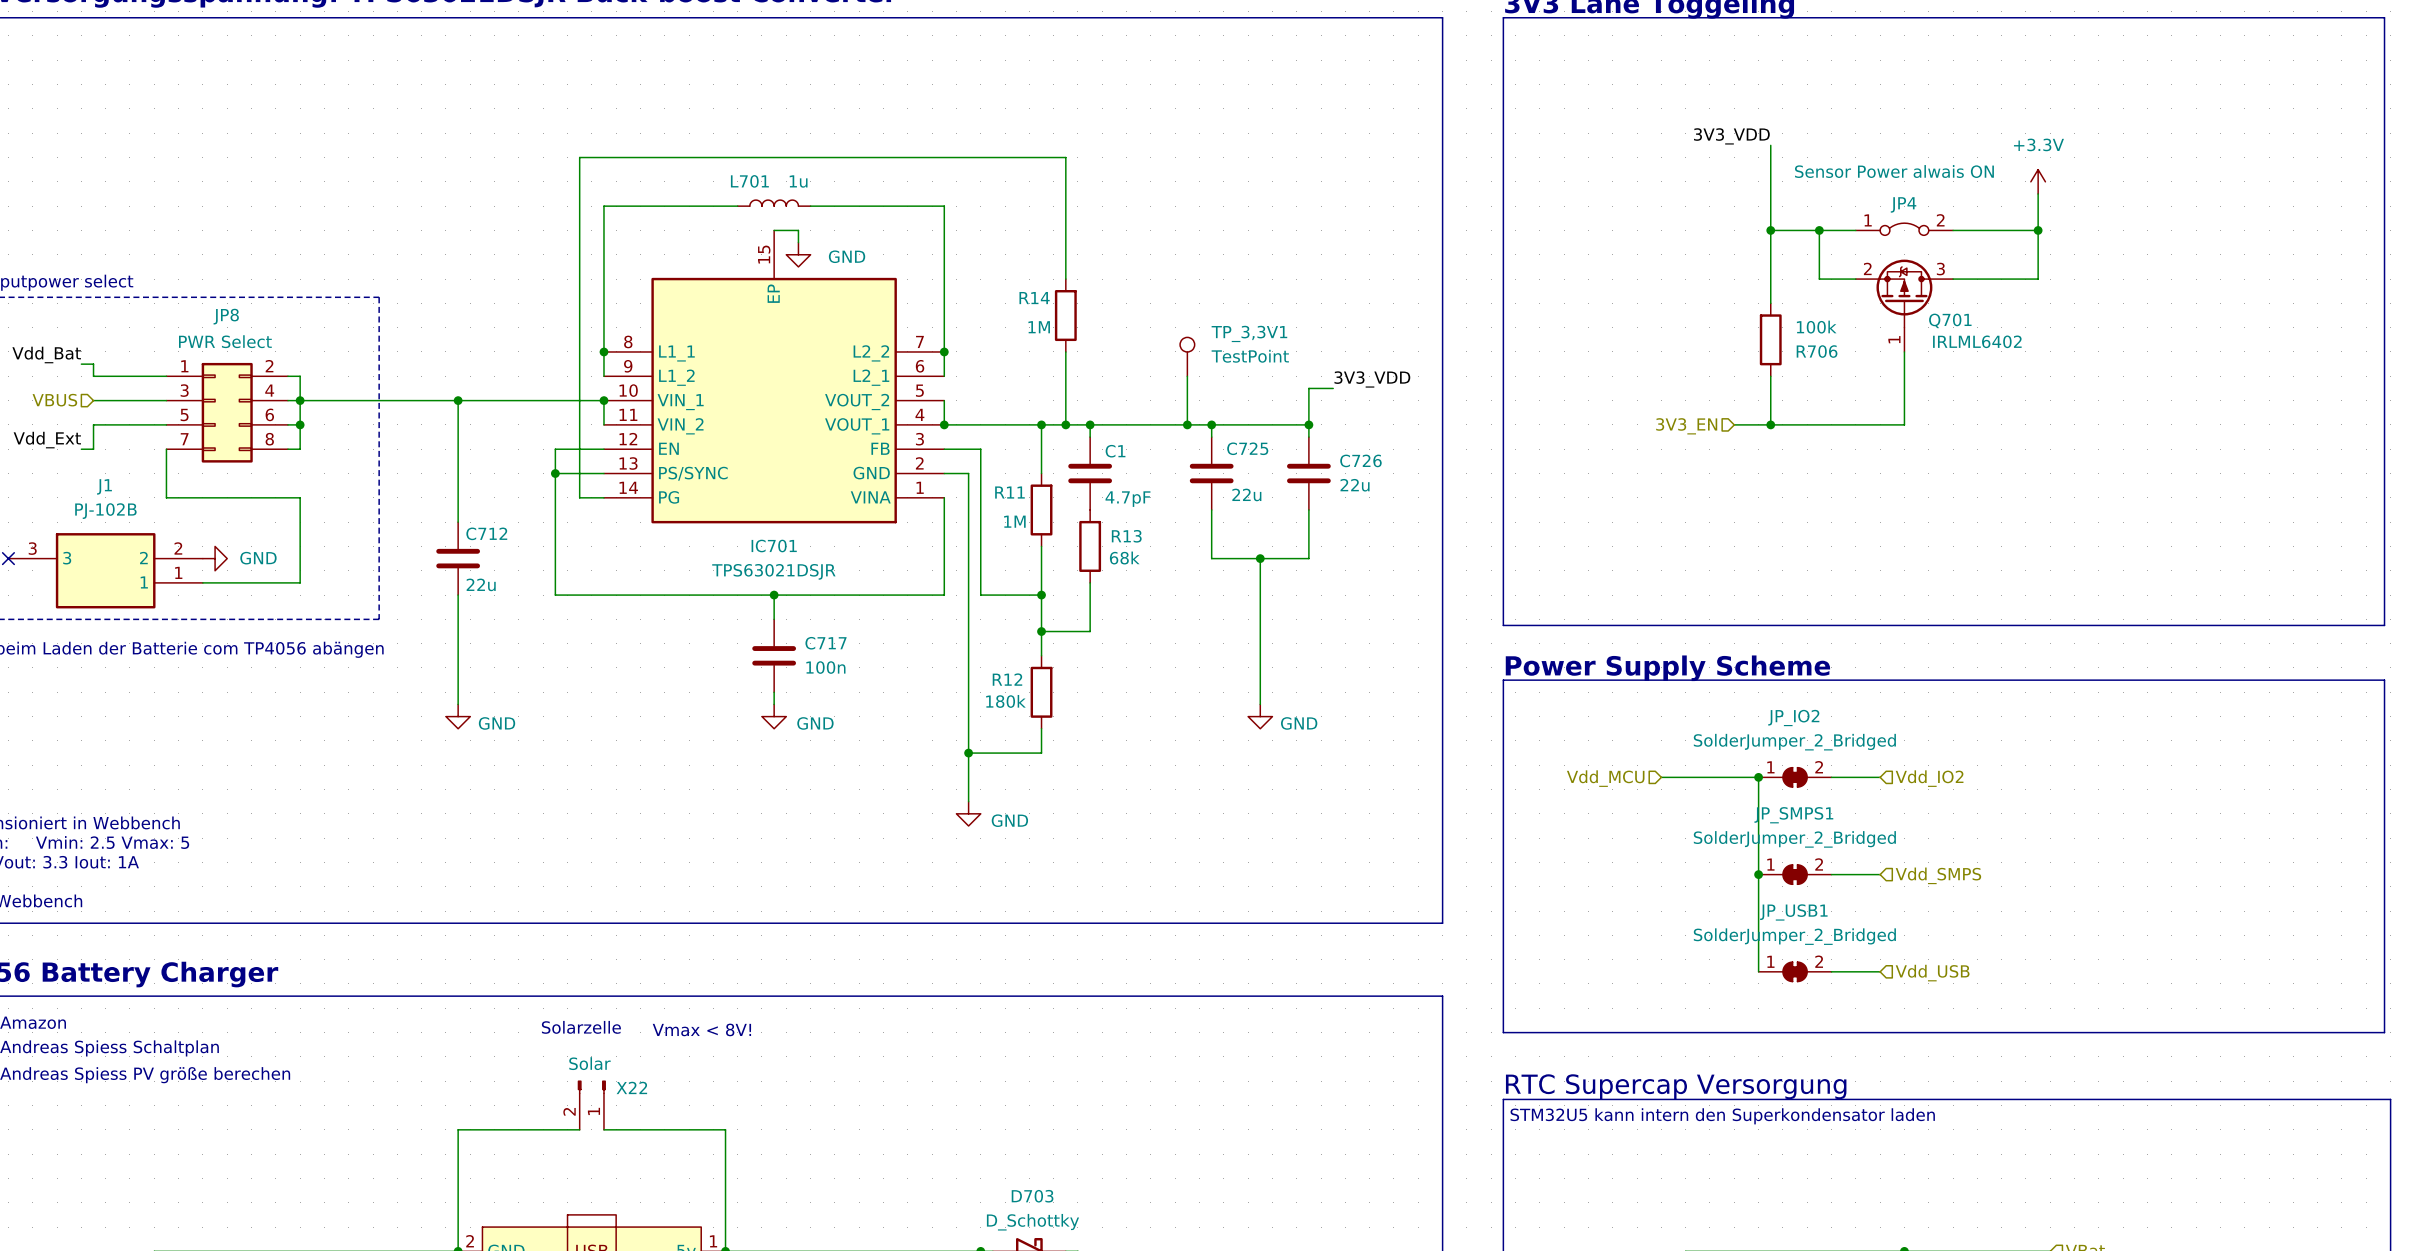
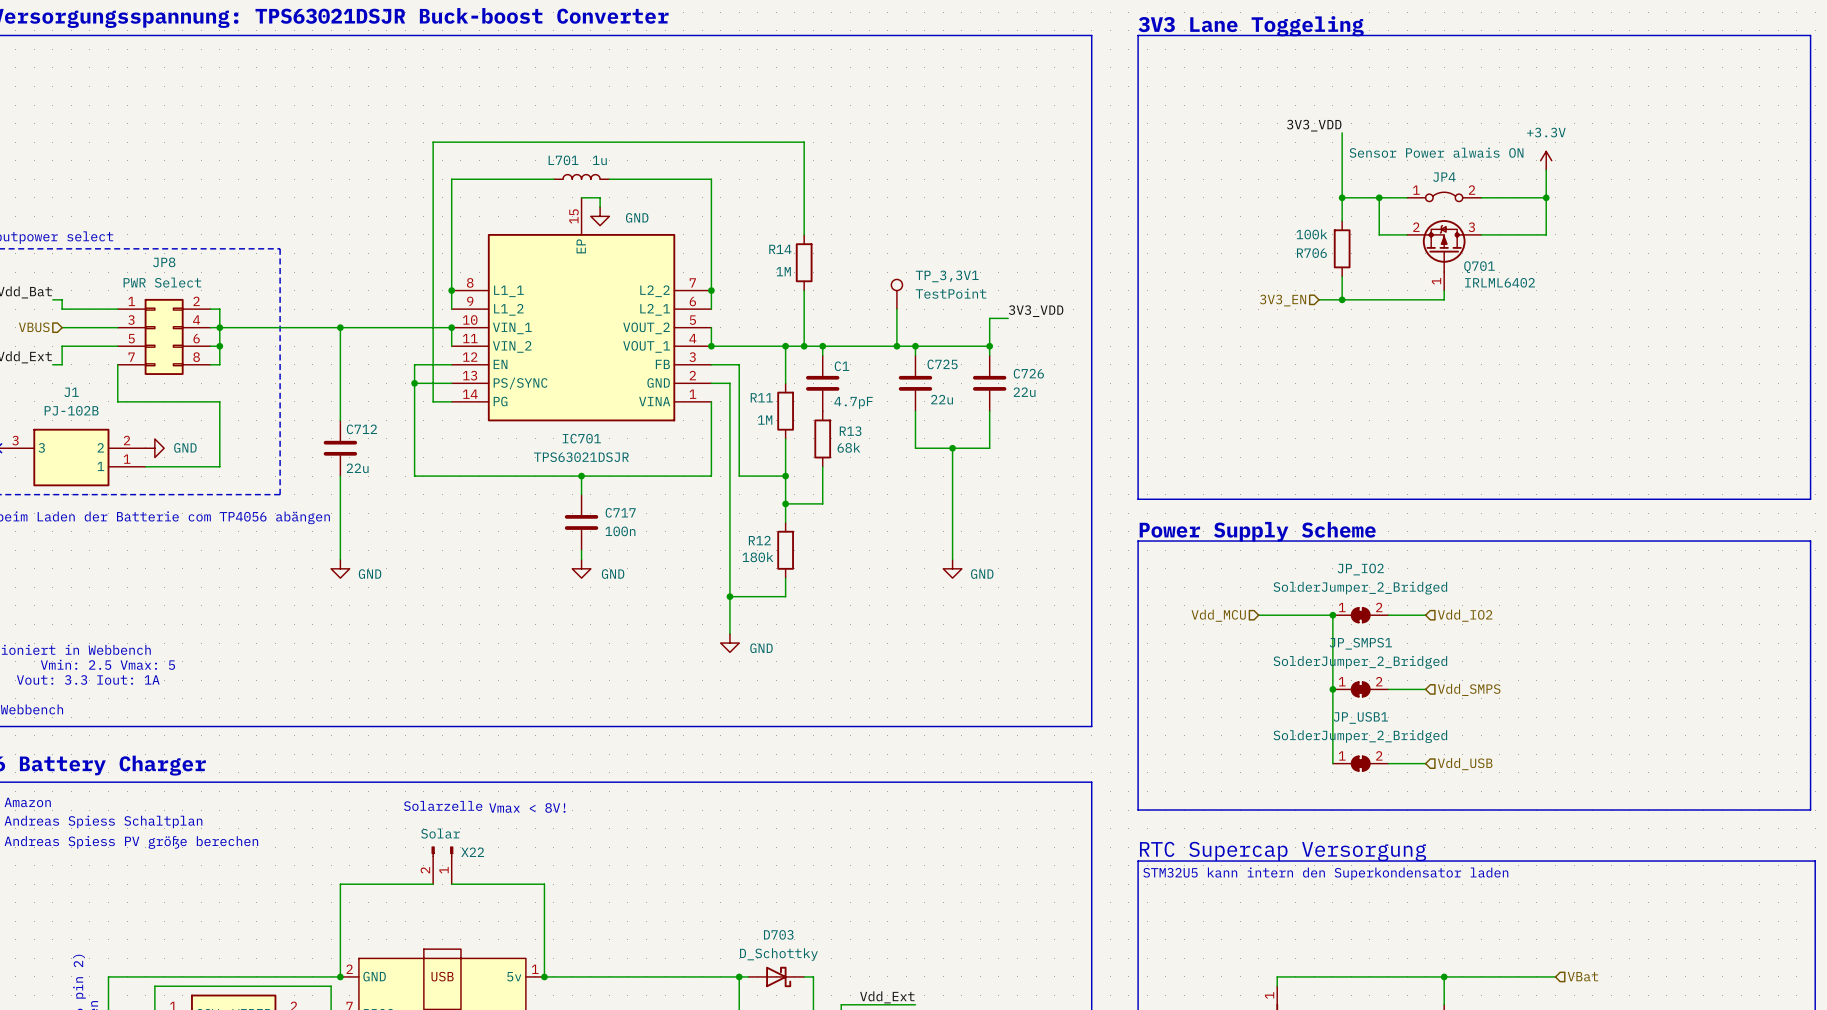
wire: (1770, 260) (1770, 303) -> none
R706 value position: 100k (1816, 327) -> 100k (1311, 234)
wire: none -> (1342, 276) (1342, 299)
R706 position: (1770, 339) -> (1342, 248)
R706 name position: R706 (1817, 351) -> R706 (1311, 253)
junction: none -> (1342, 299)
wire: (1904, 364) (1904, 424) (1734, 424) -> (1444, 299) (1318, 299)
wire: (1770, 376) (1770, 424) -> none
junction: (1770, 424) -> none
hierarchical label position: 3V3_EN (1686, 426) -> 3V3_EN (1283, 300)

